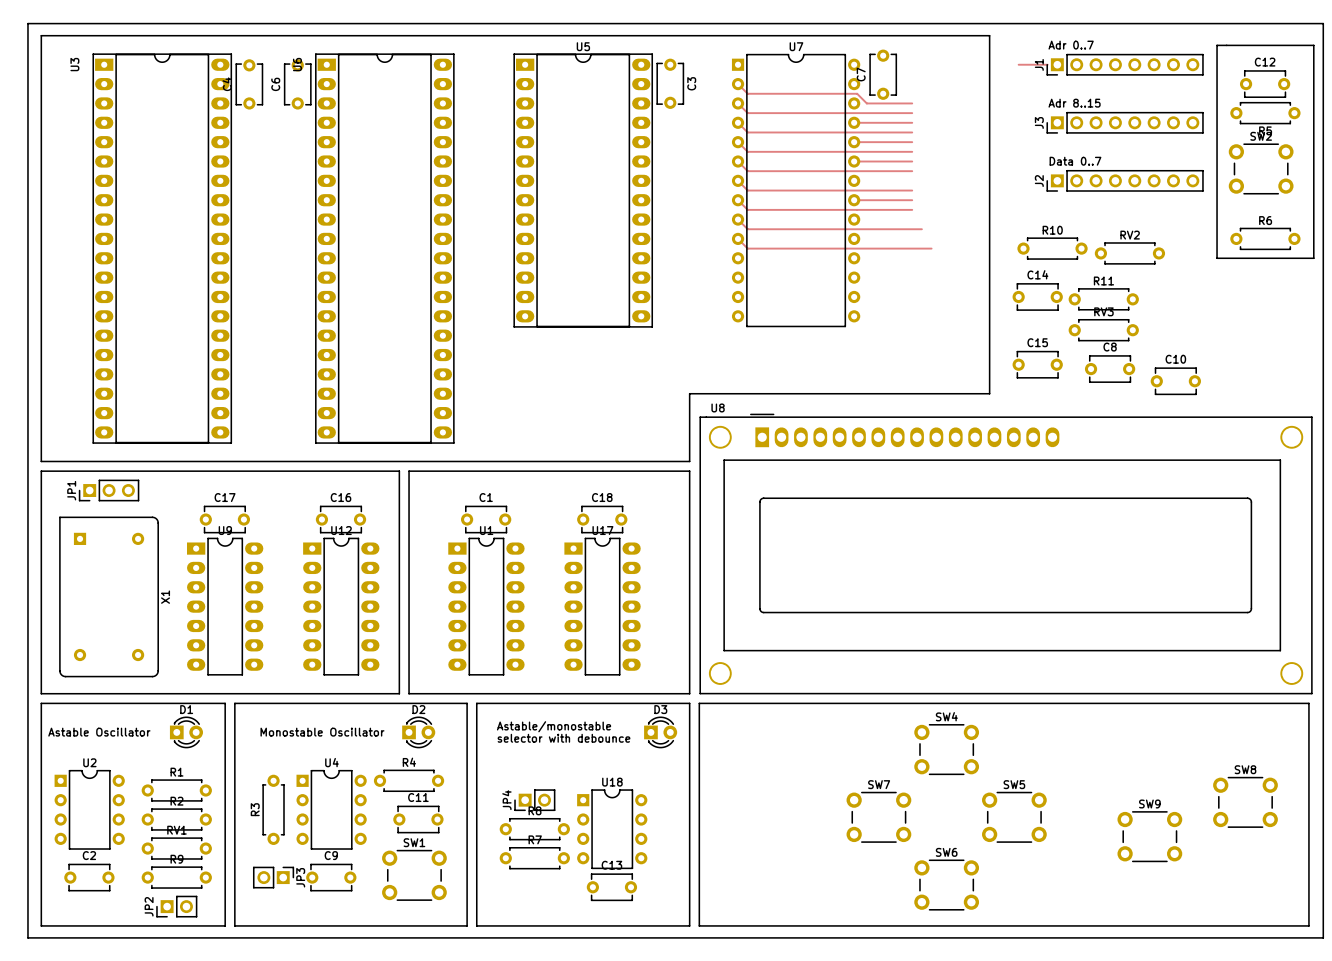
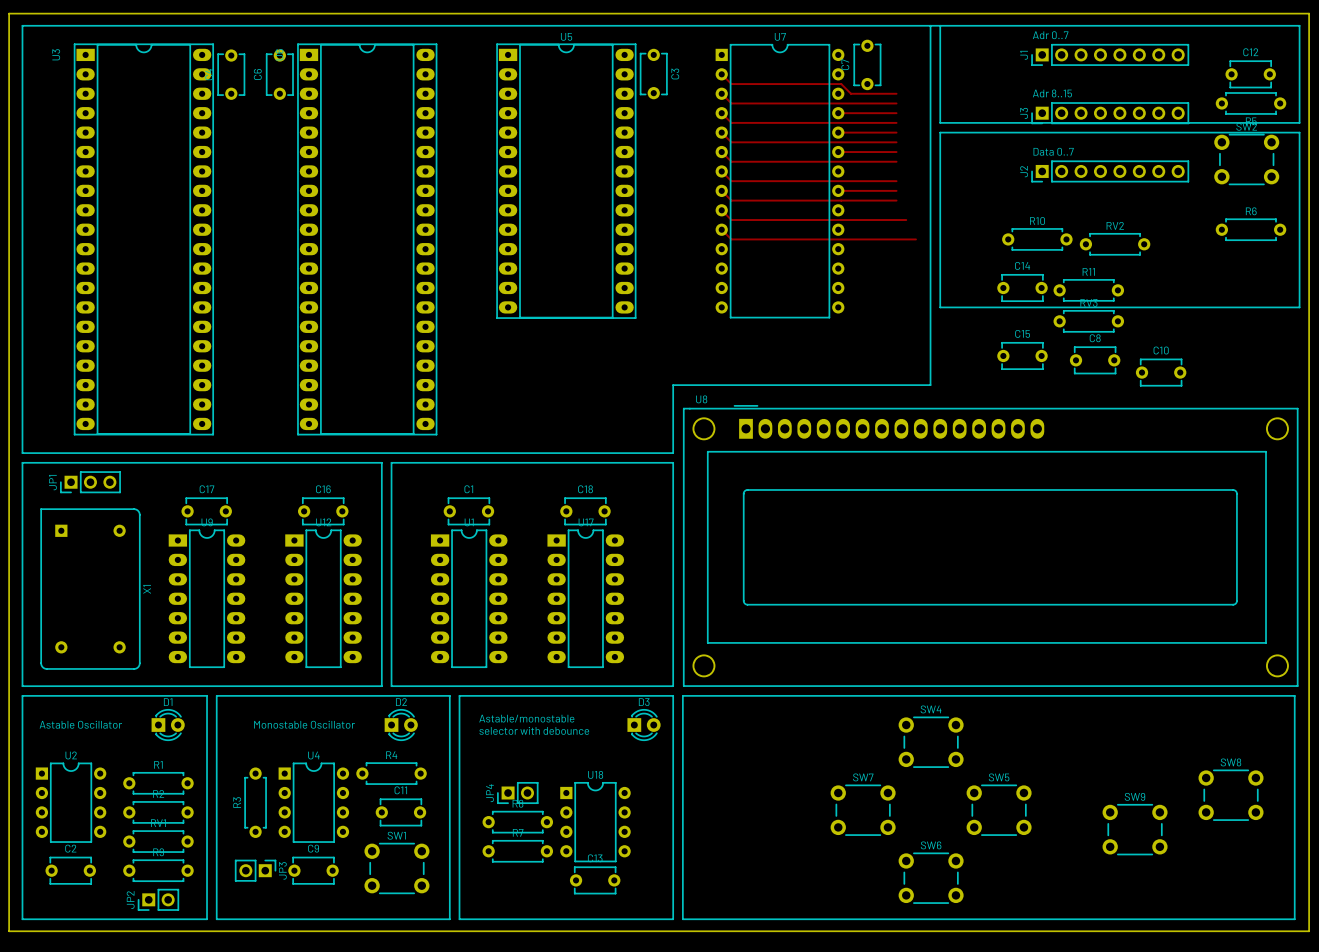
line: (989, 35) (989, 393) (946, 393) -> (930, 25) (930, 385)
line: none -> (974, 25) (1299, 25) (1299, 35)
line: (1313, 45) (1217, 45) (1217, 258) (1313, 258) -> (1299, 132) (940, 132) (940, 307) (1299, 307) (1299, 249)
top track: (1018, 64) (1047, 64) -> none
line: (1313, 132) (1313, 142) -> (1299, 122) (940, 122) (940, 25)

